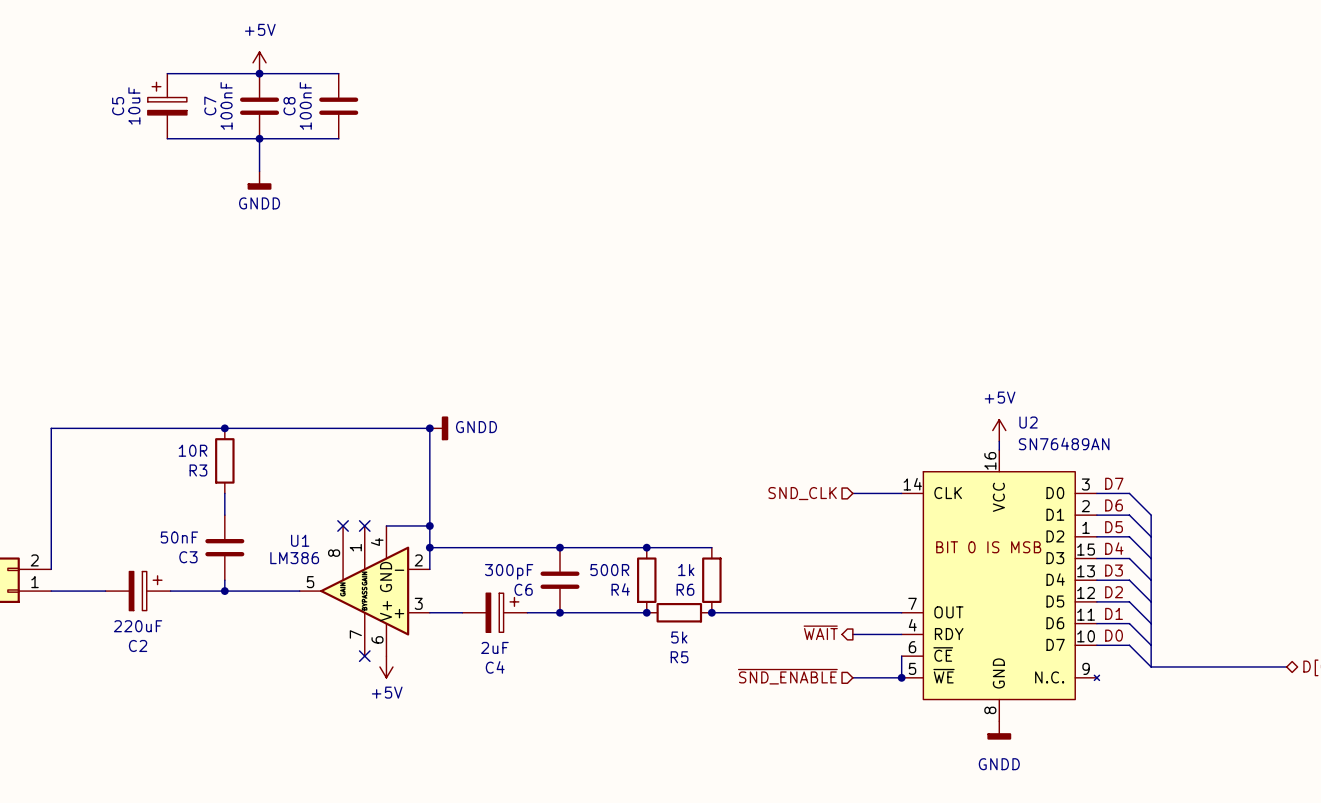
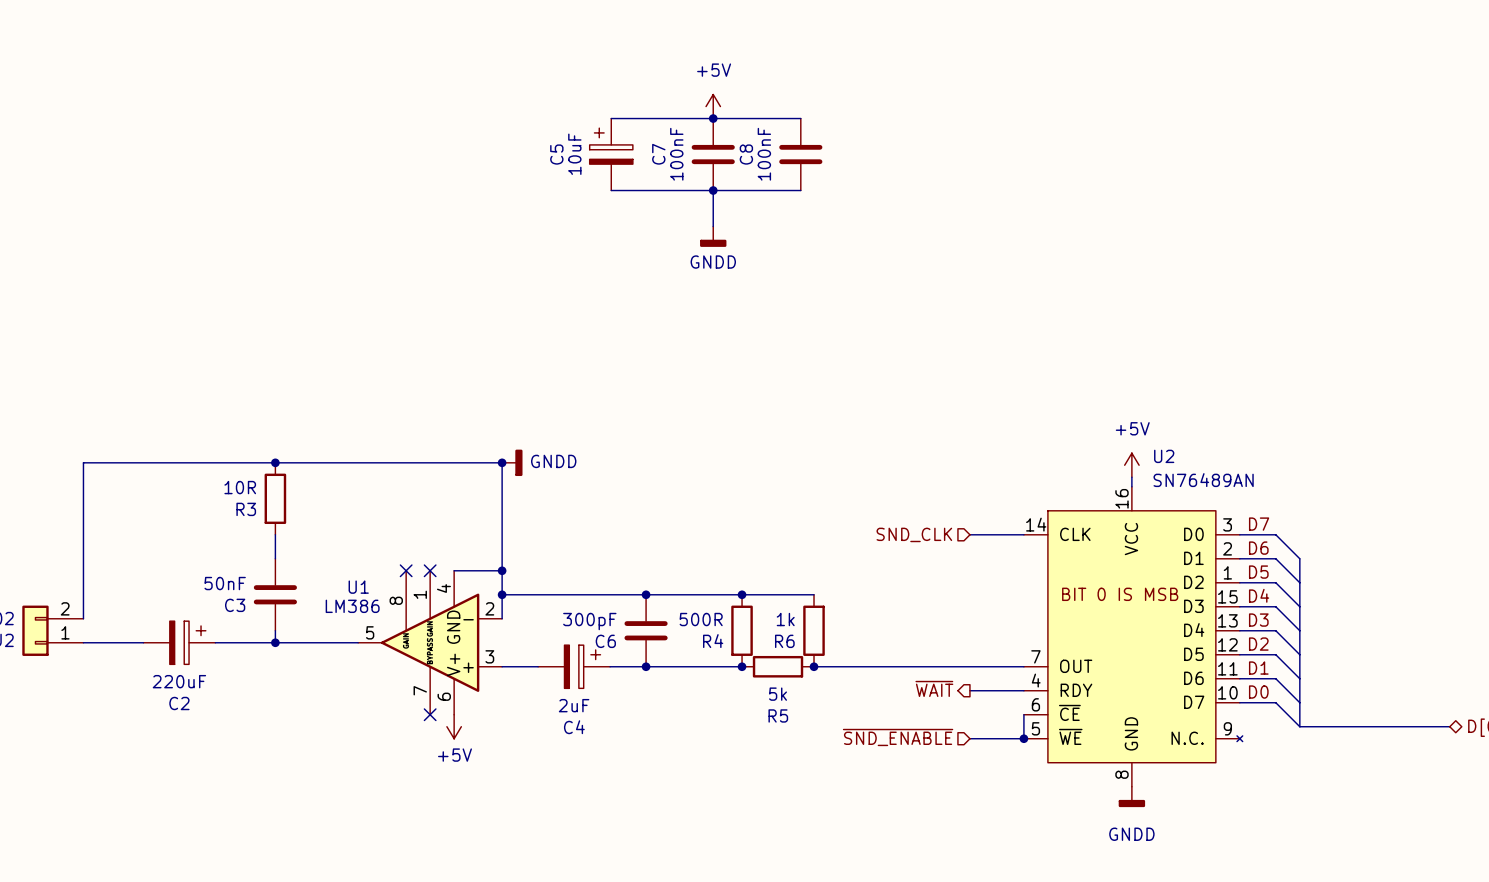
power symbol: +5V (259, 62) -> none
wire: (167, 73) (338, 73) -> none
junction: (259, 73) -> none
C5 position: (167, 106) -> (611, 154)
C7 position: (259, 106) -> (713, 154)
C8 position: (338, 106) -> (800, 154)
power symbol: none -> +5V (713, 106)
wire: none -> (611, 118) (800, 118)
junction: none -> (713, 118)
wire: (167, 138) (338, 138) -> none
wire: (259, 138) (259, 171) -> none
junction: (259, 138) -> none
power symbol: GNDD (259, 180) -> none
wire: none -> (611, 190) (800, 190)
wire: none -> (713, 190) (713, 226)
junction: none -> (713, 190)
power symbol: none -> GNDD (713, 236)

